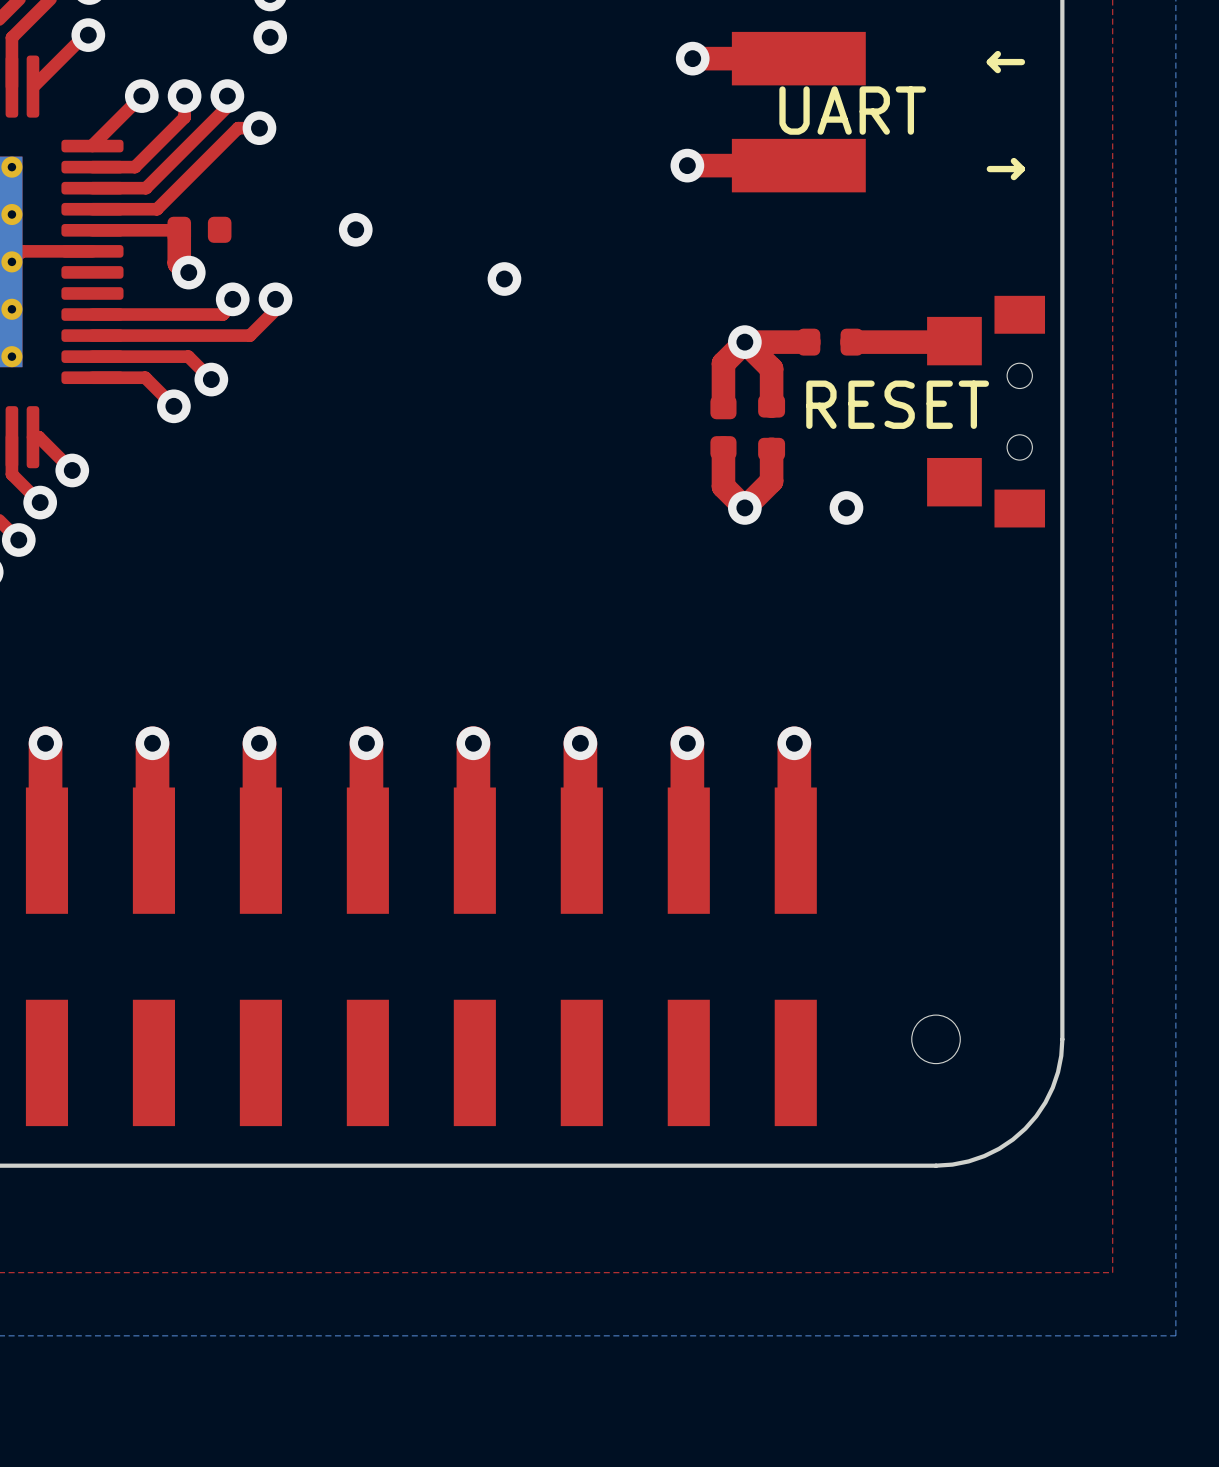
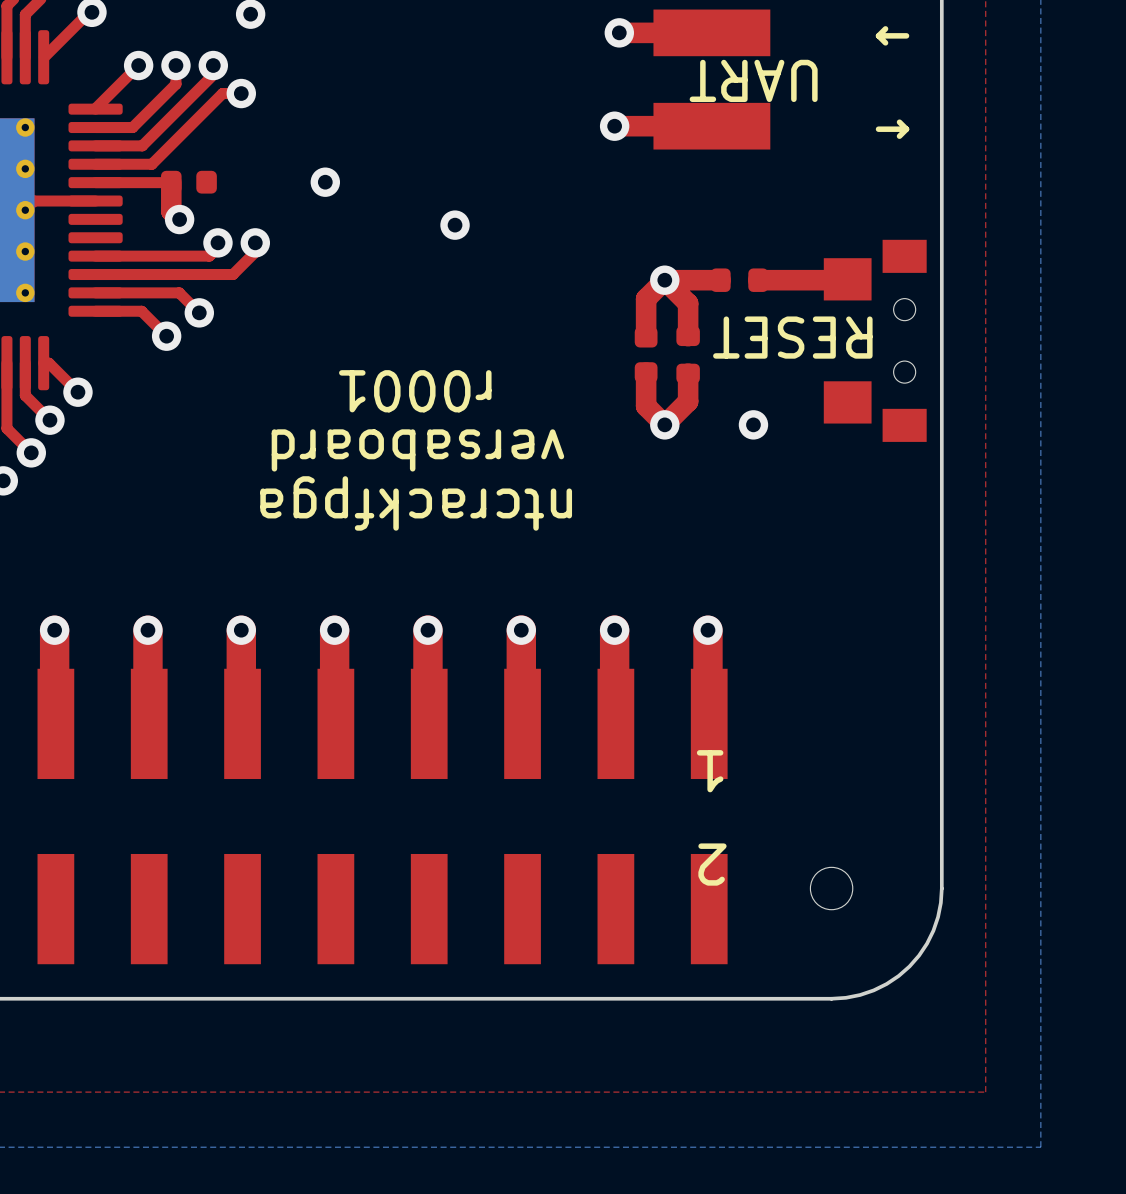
text rotation: 0° (852, 110) -> 180° (753, 80)
text rotation: 0° (897, 404) -> 180° (792, 337)
text: none -> r0001 (415, 391)
text: none -> versaboard (417, 450)
text: none -> ntcrackfpga (416, 503)
text: none -> 1 (710, 771)
text: none -> 2 (712, 864)

